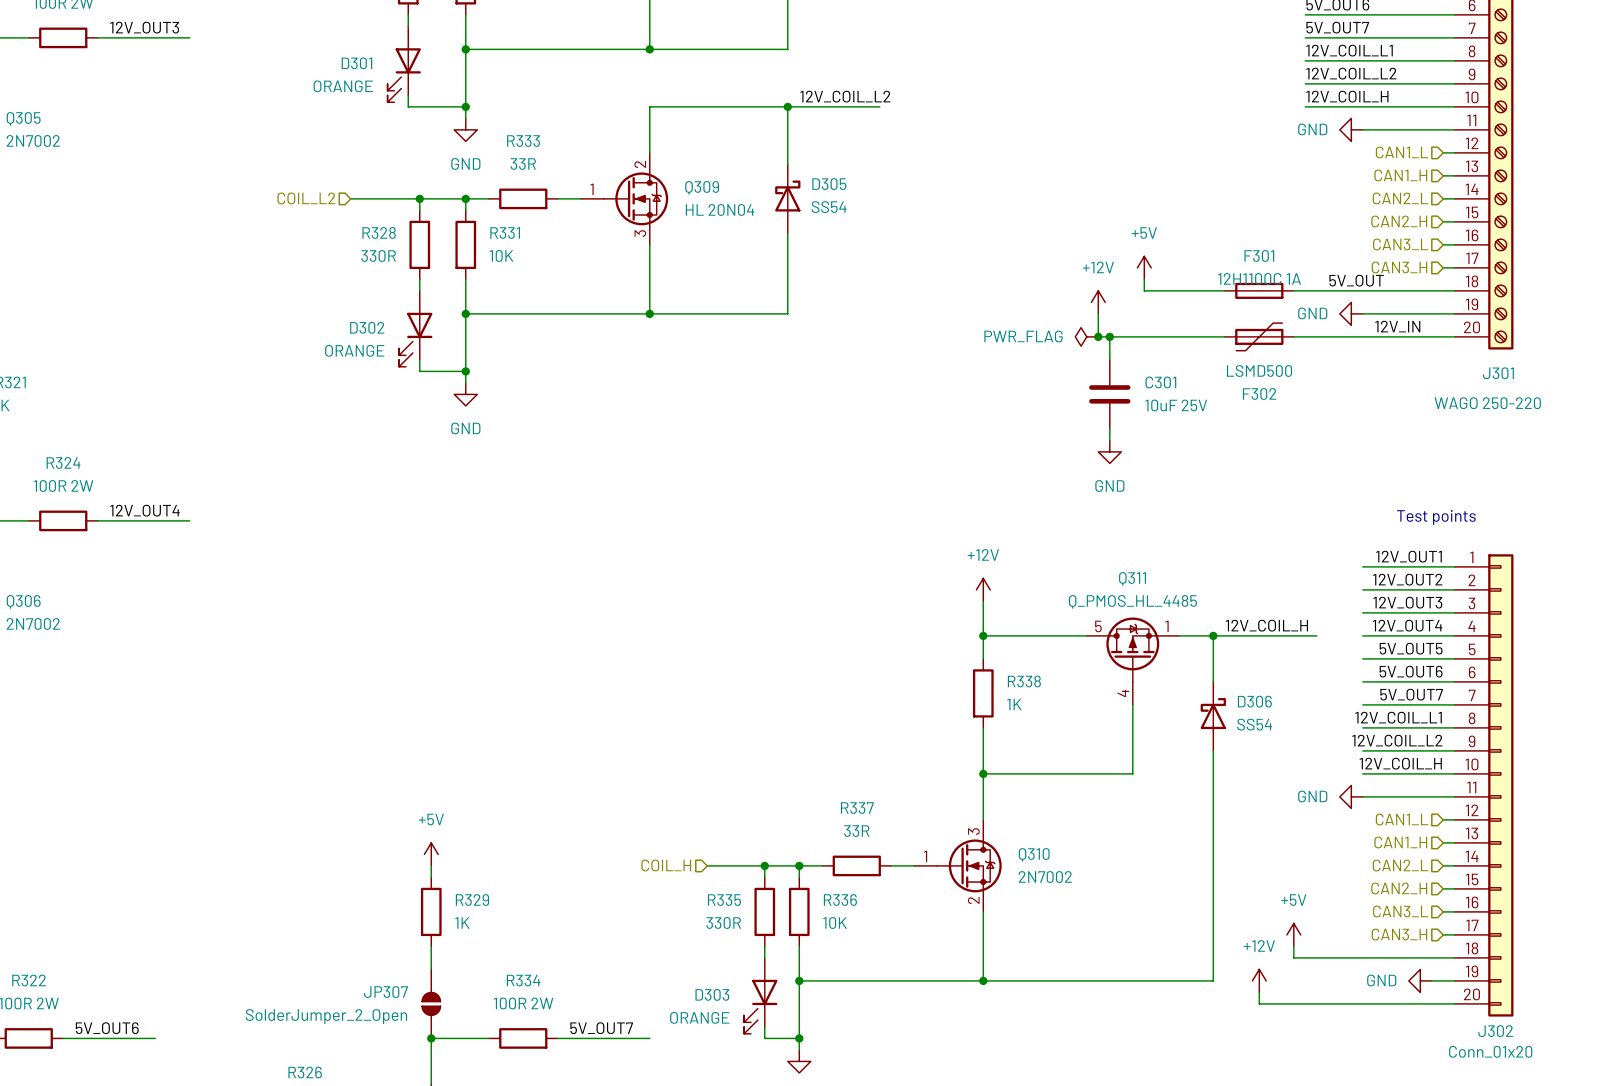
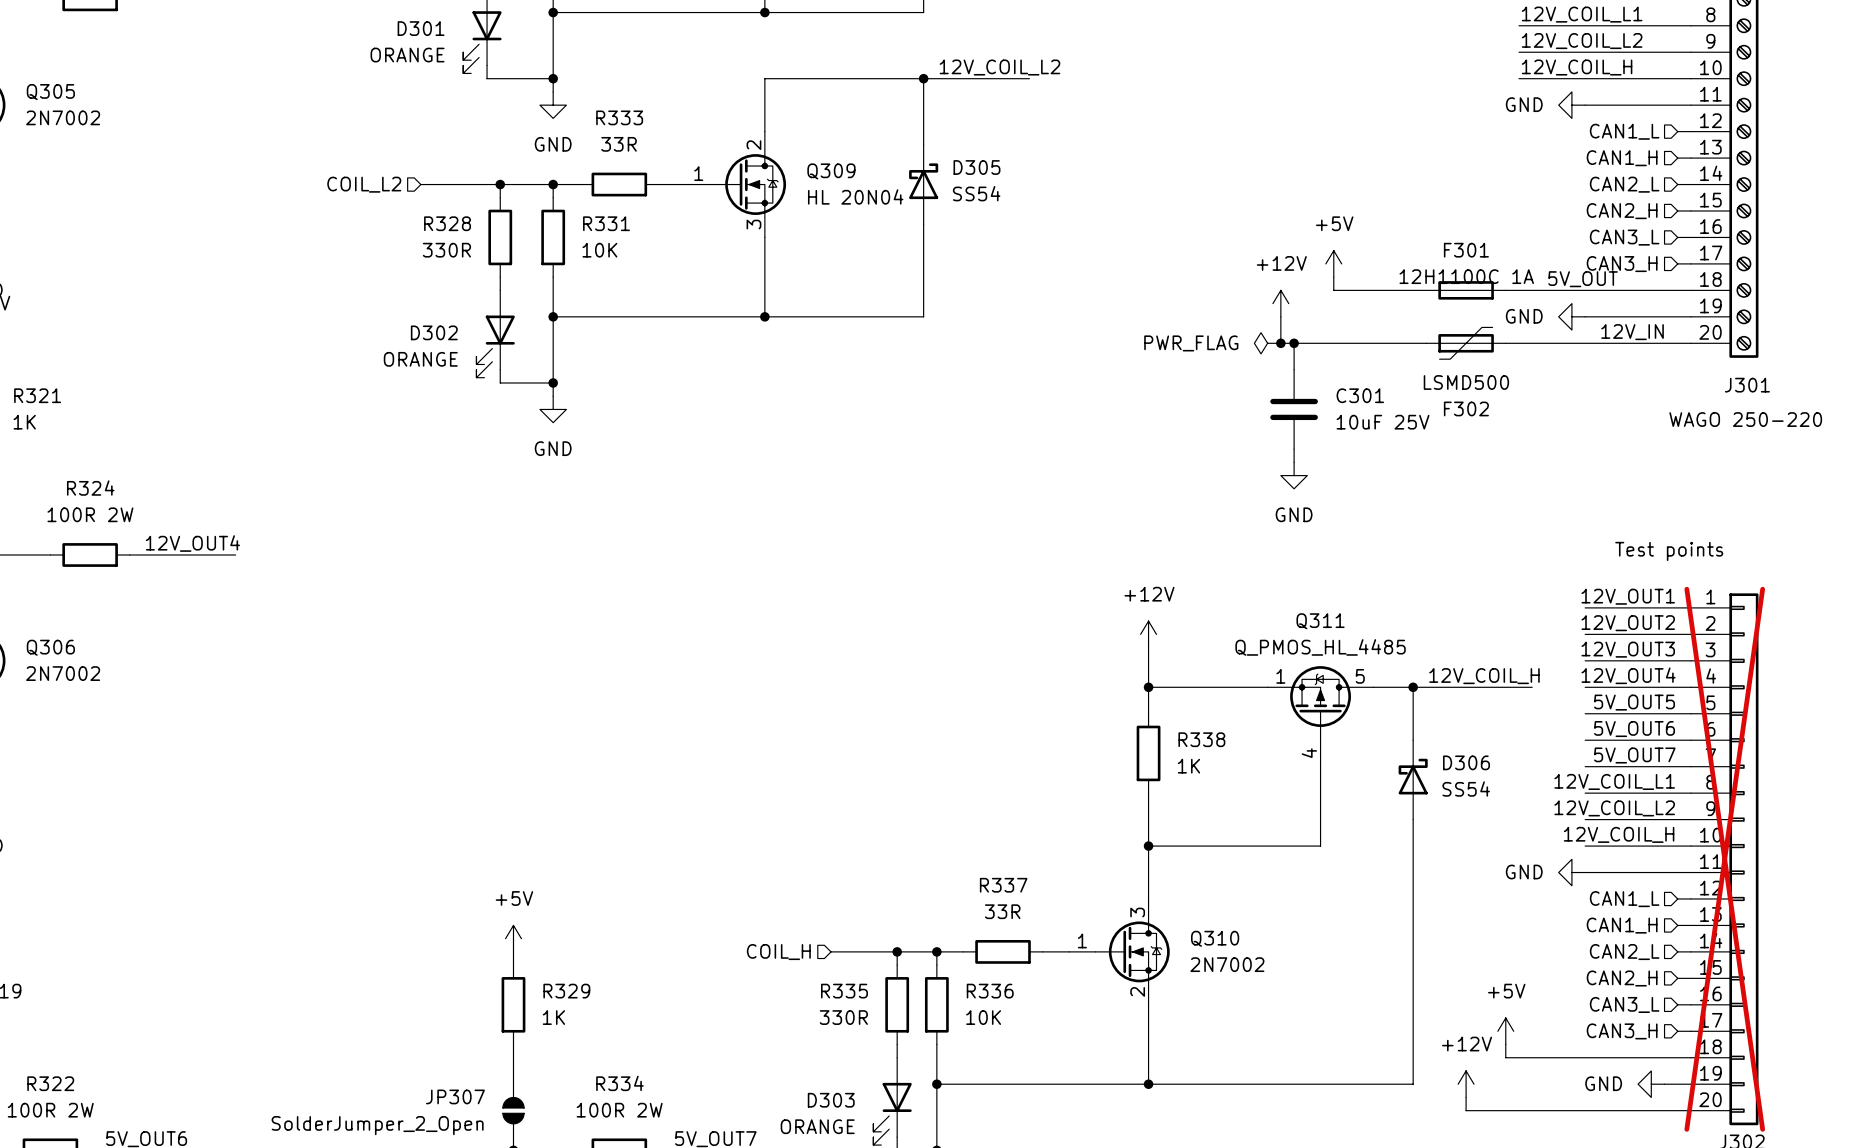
Q311 flip: as is (1132, 649) -> left-right (1320, 703)
J302 do-not-place cross: none -> (1724, 859)

